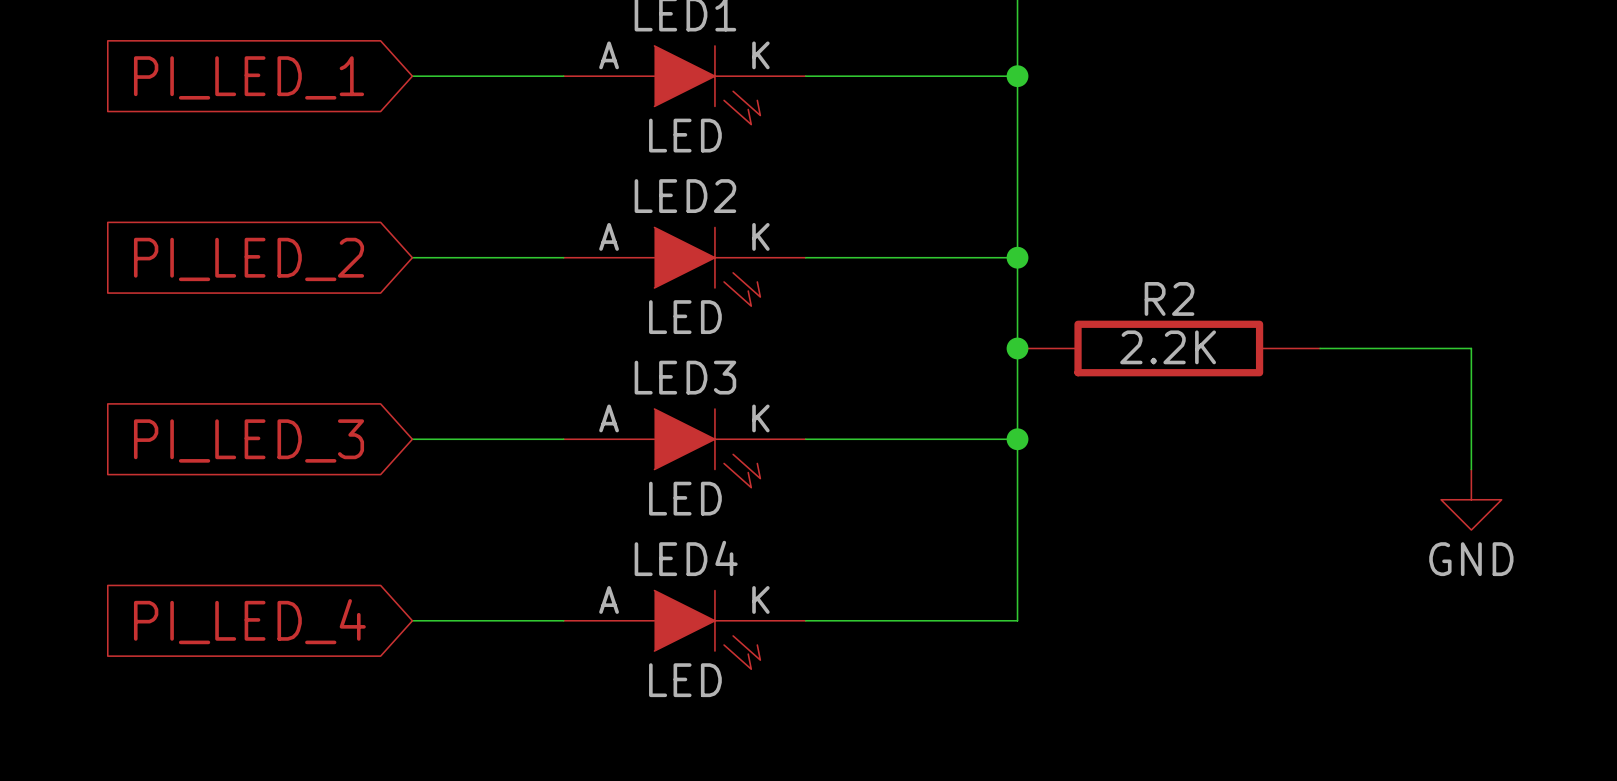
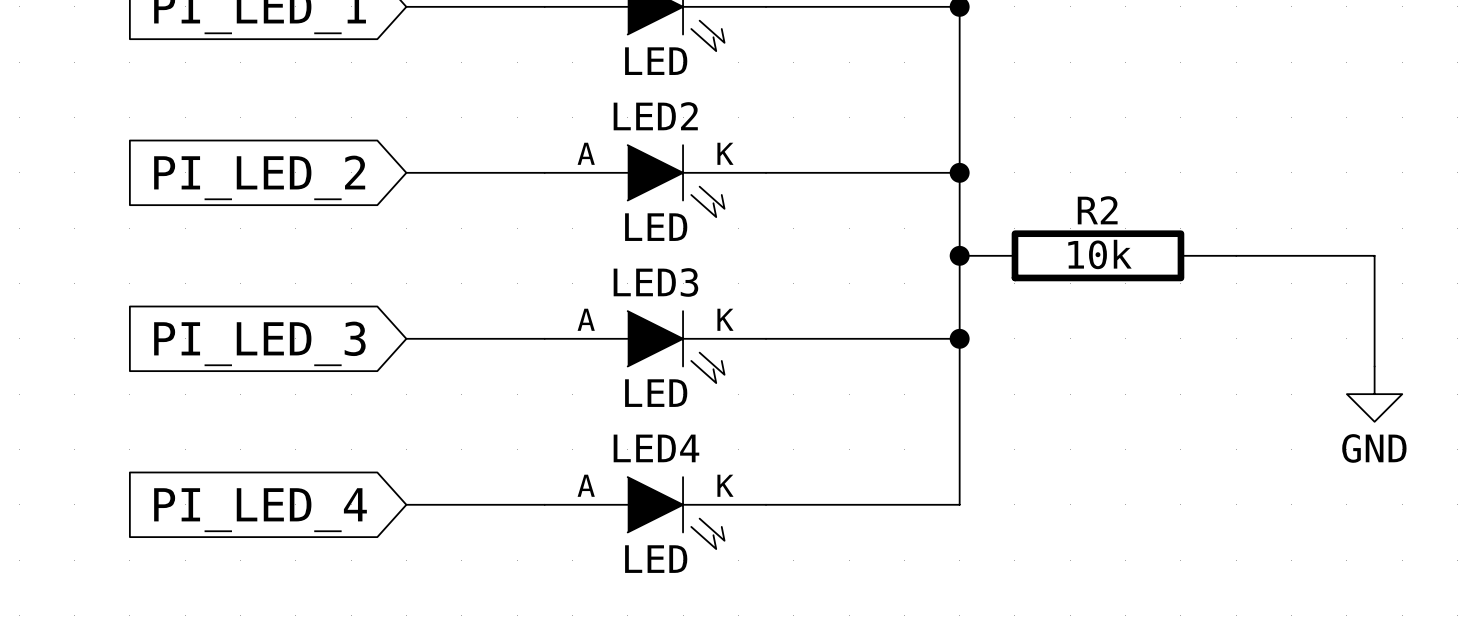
R2 value: 2.2K (1168, 347) -> 10k (1099, 254)

